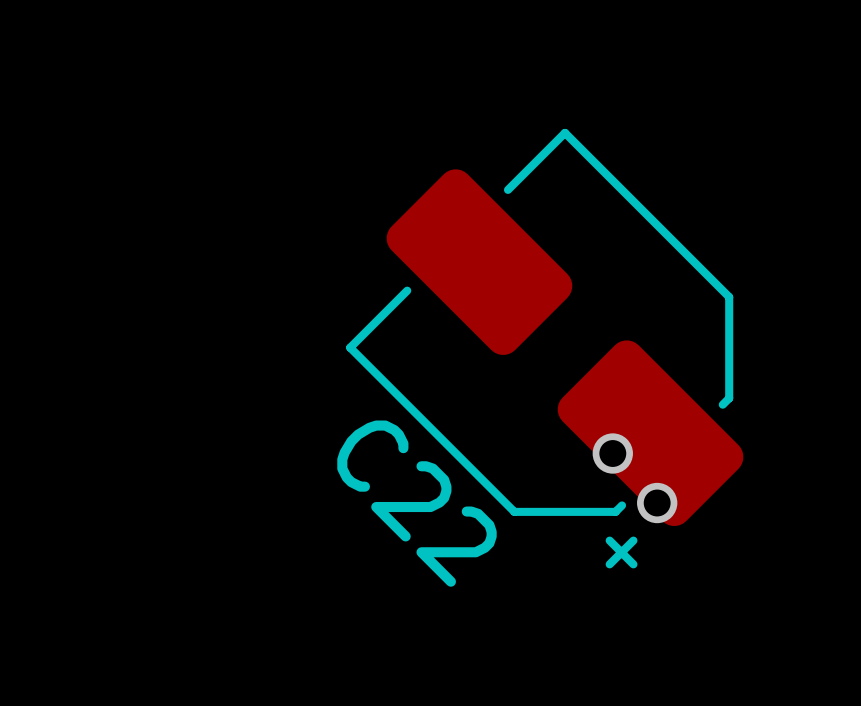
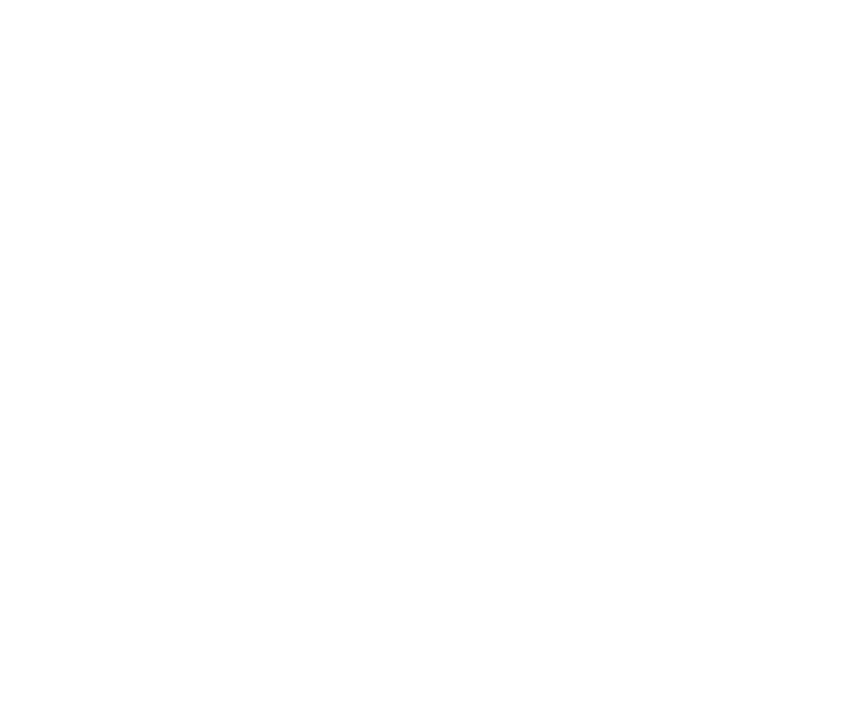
C22: (544, 348) -> none
via: (612, 453) -> none
via: (657, 503) -> none

